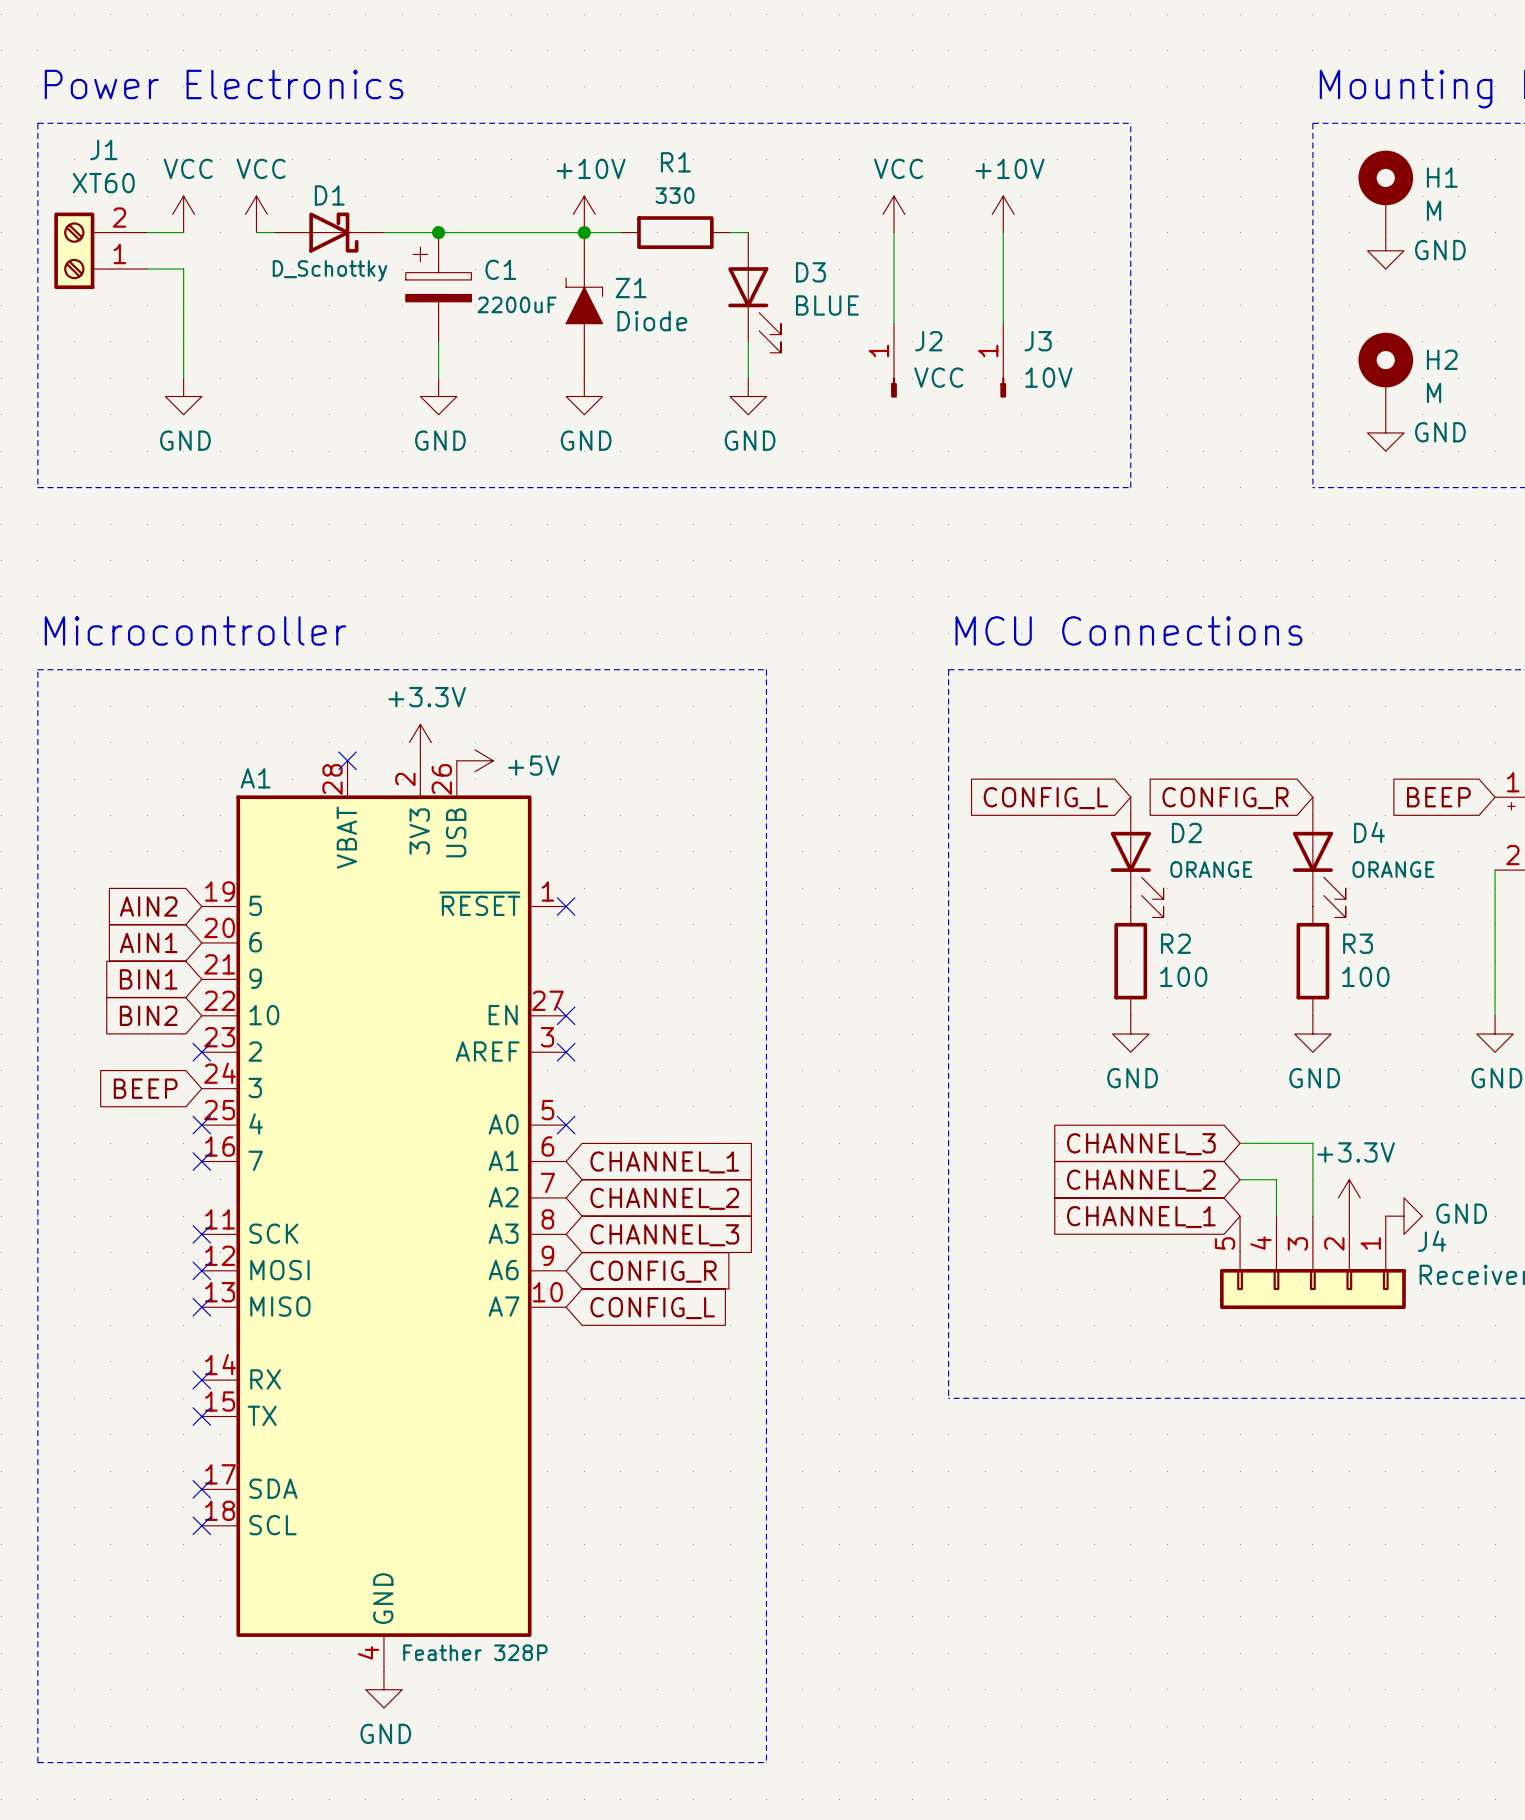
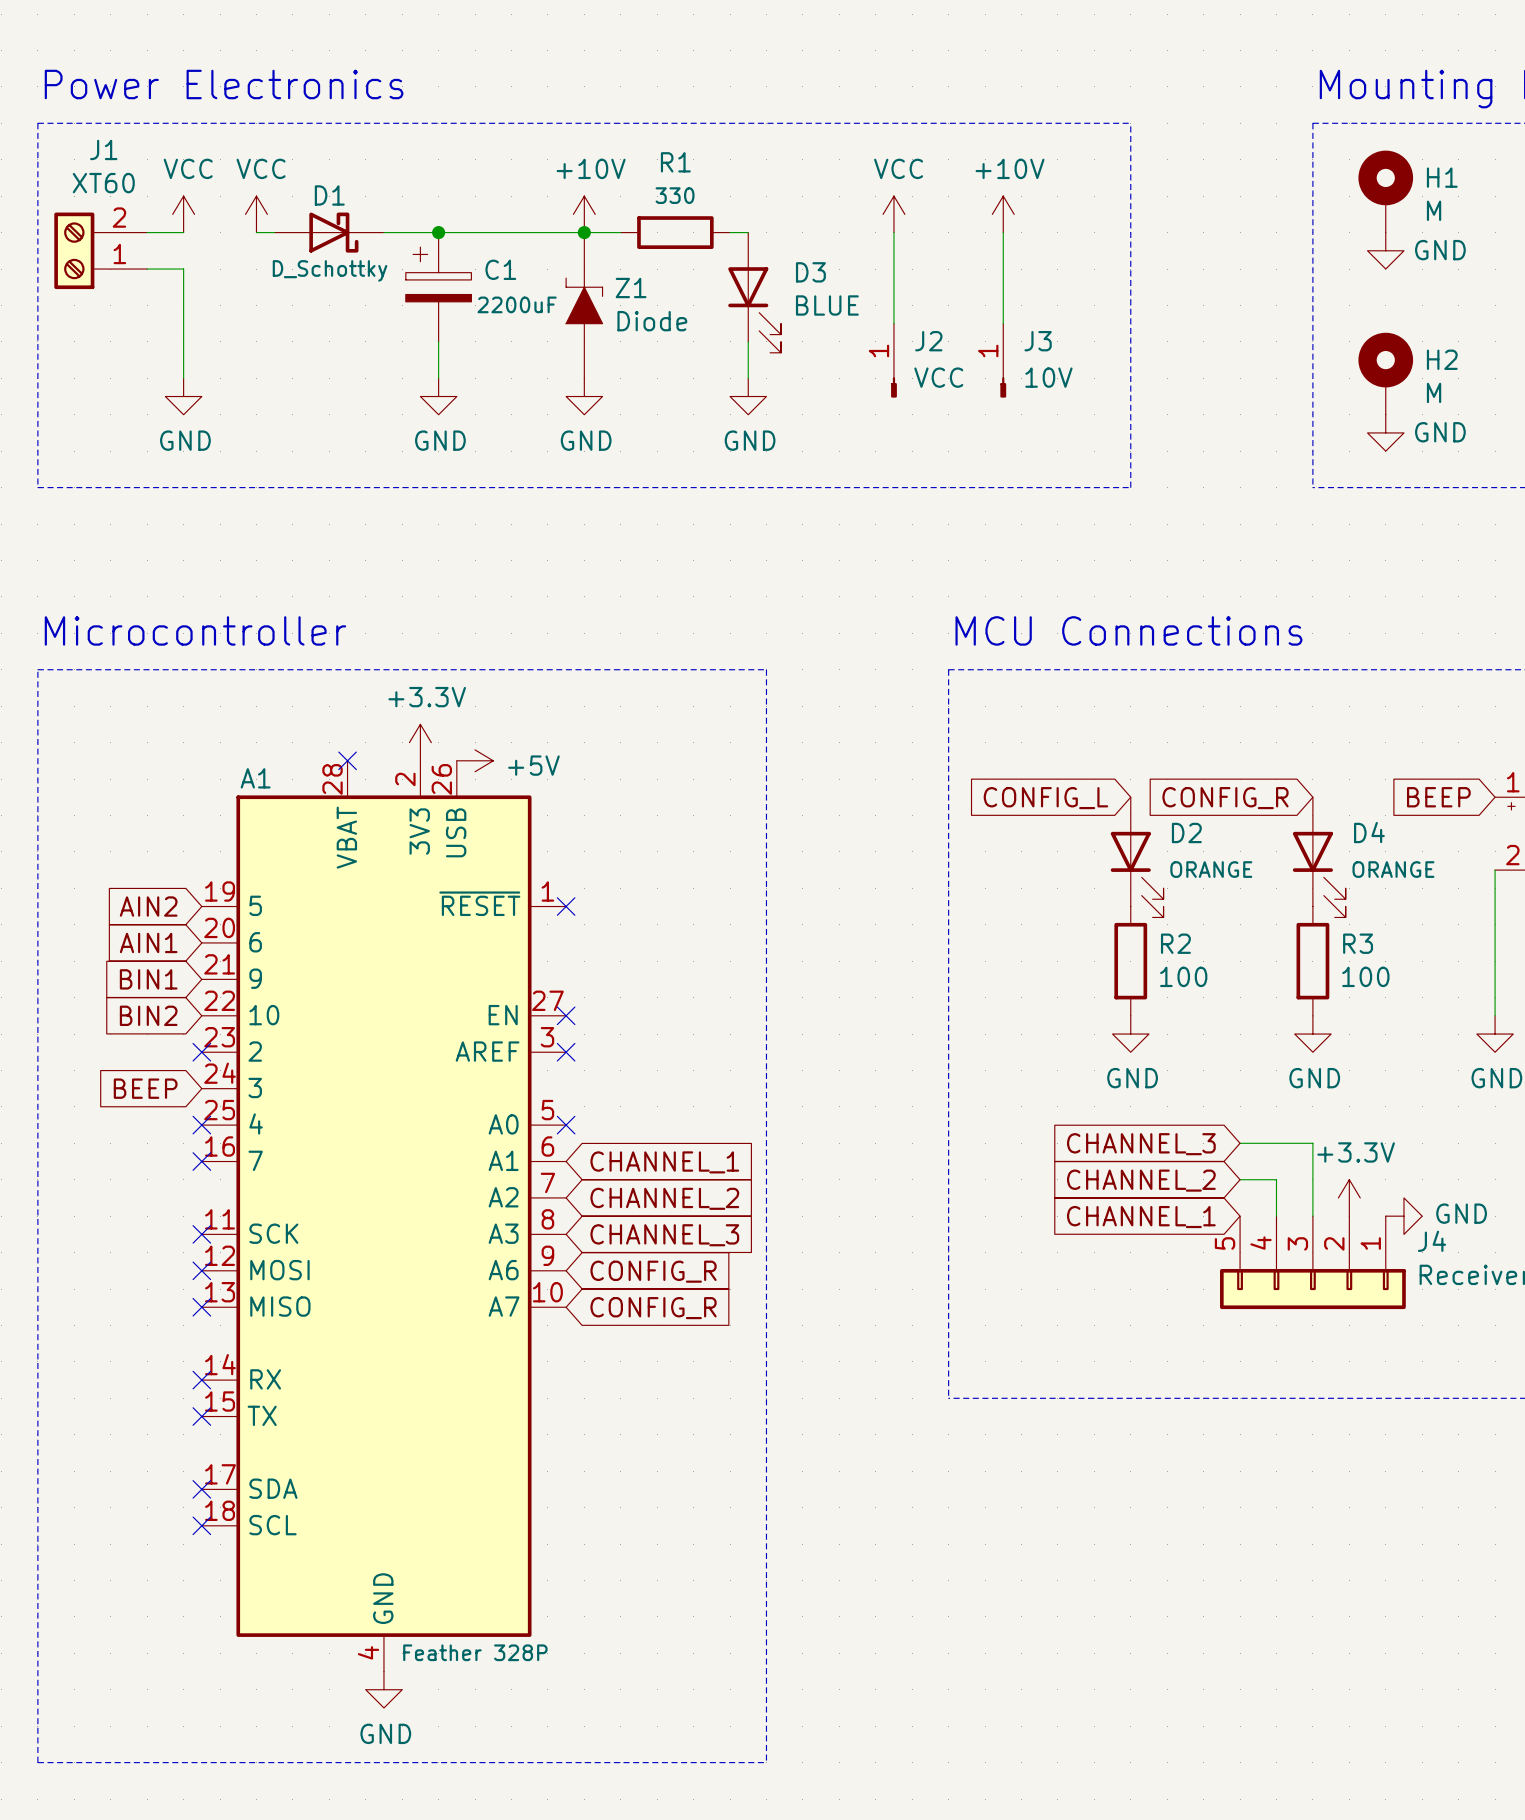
global label: CONFIG_L (652, 1308) -> CONFIG_R (653, 1308)

